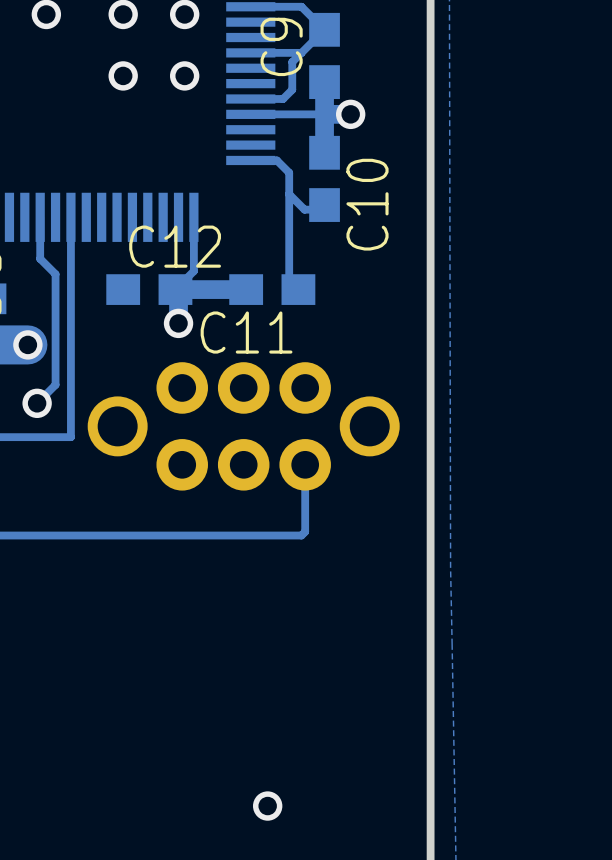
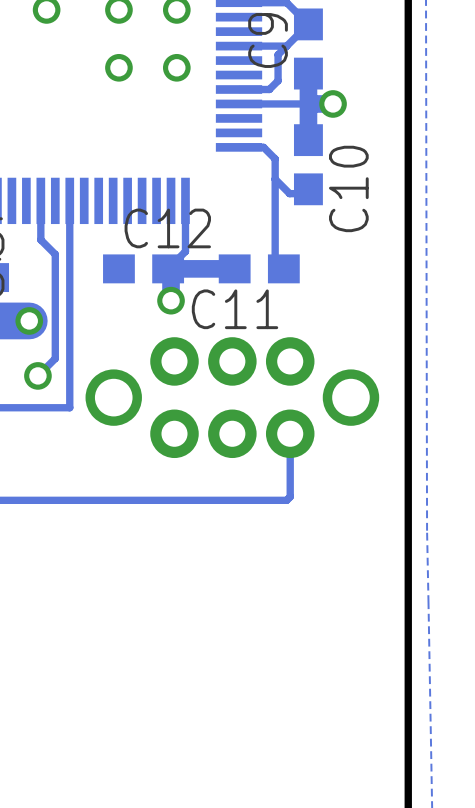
via: (267, 806) -> none

